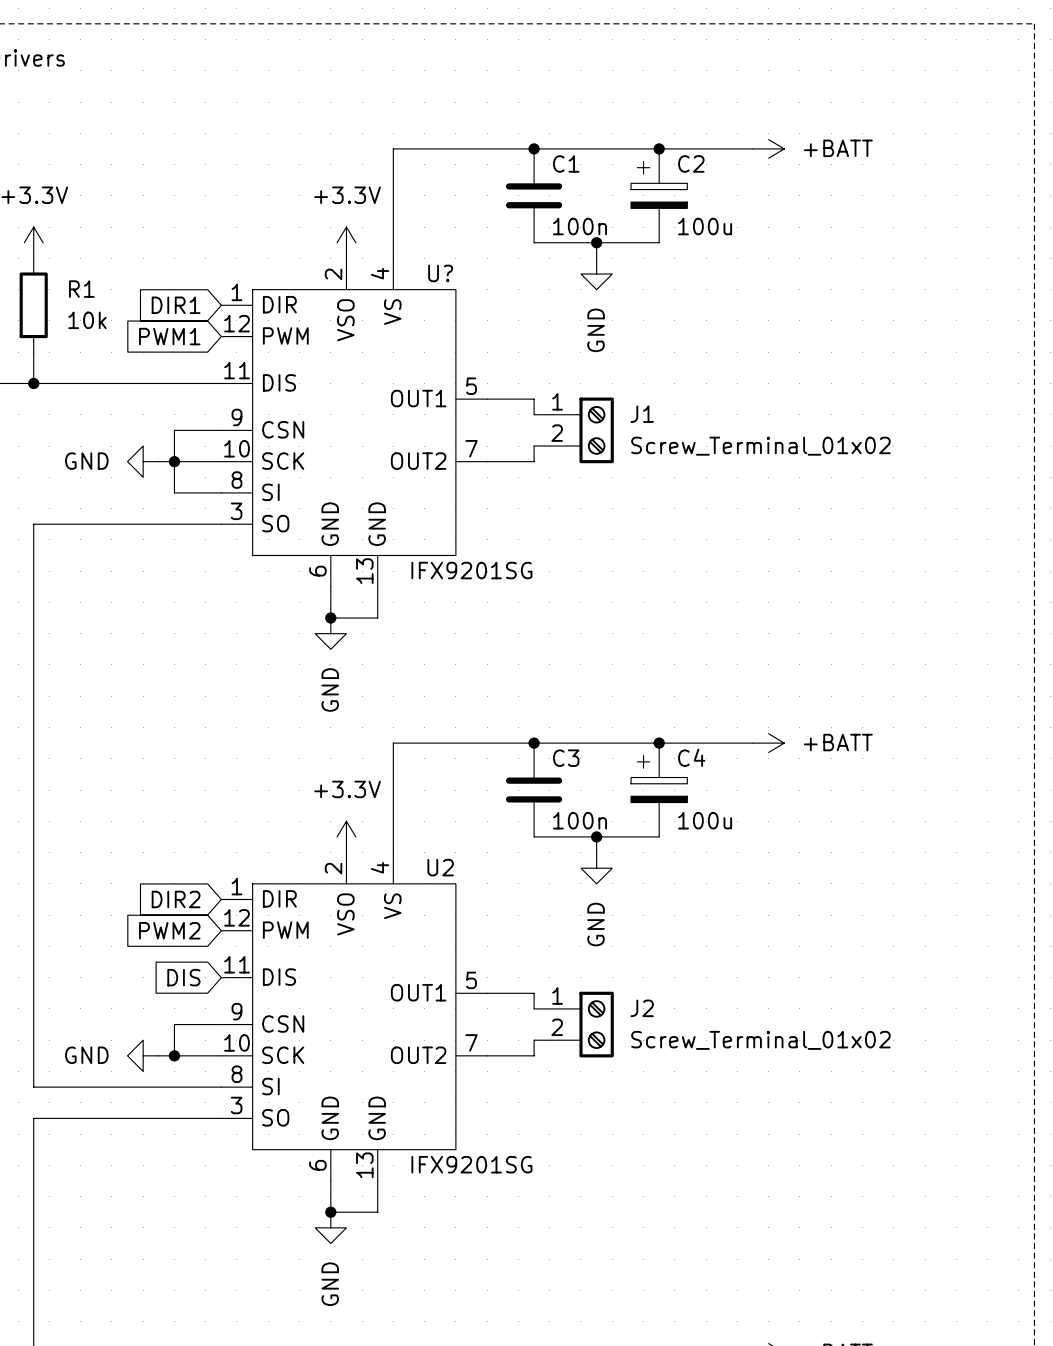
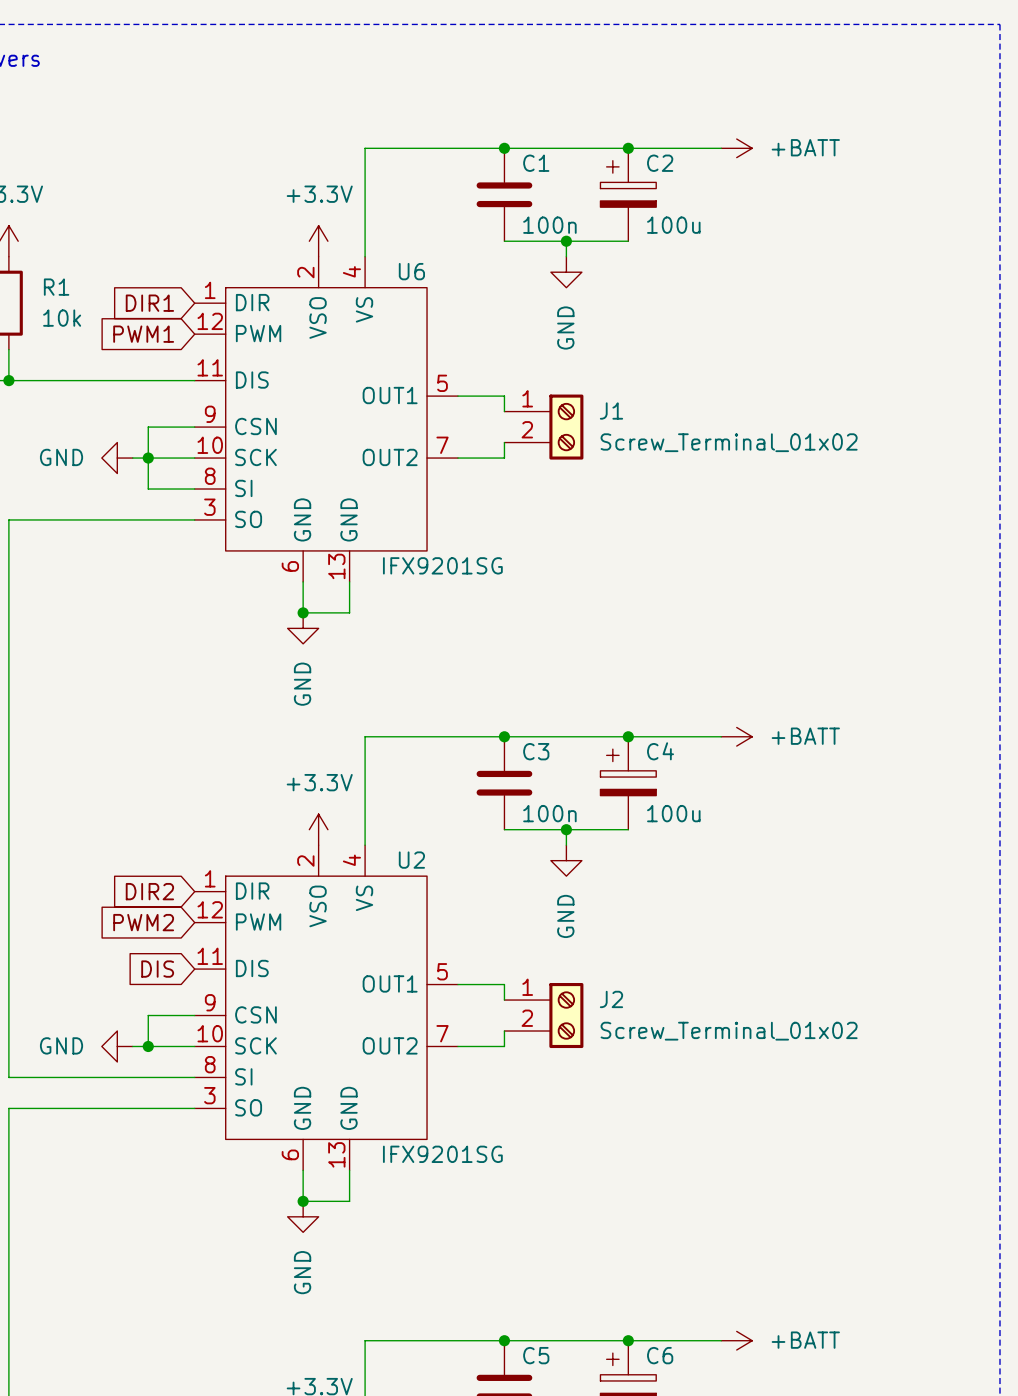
U? name: U? (440, 273) -> U6 (411, 271)

